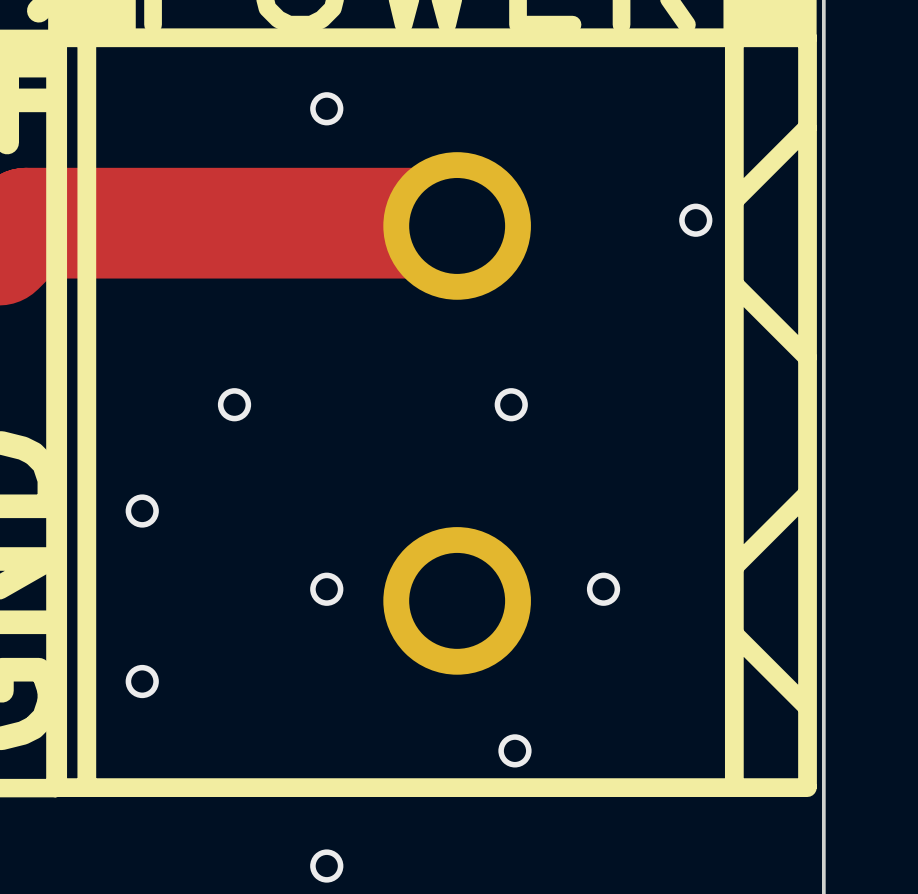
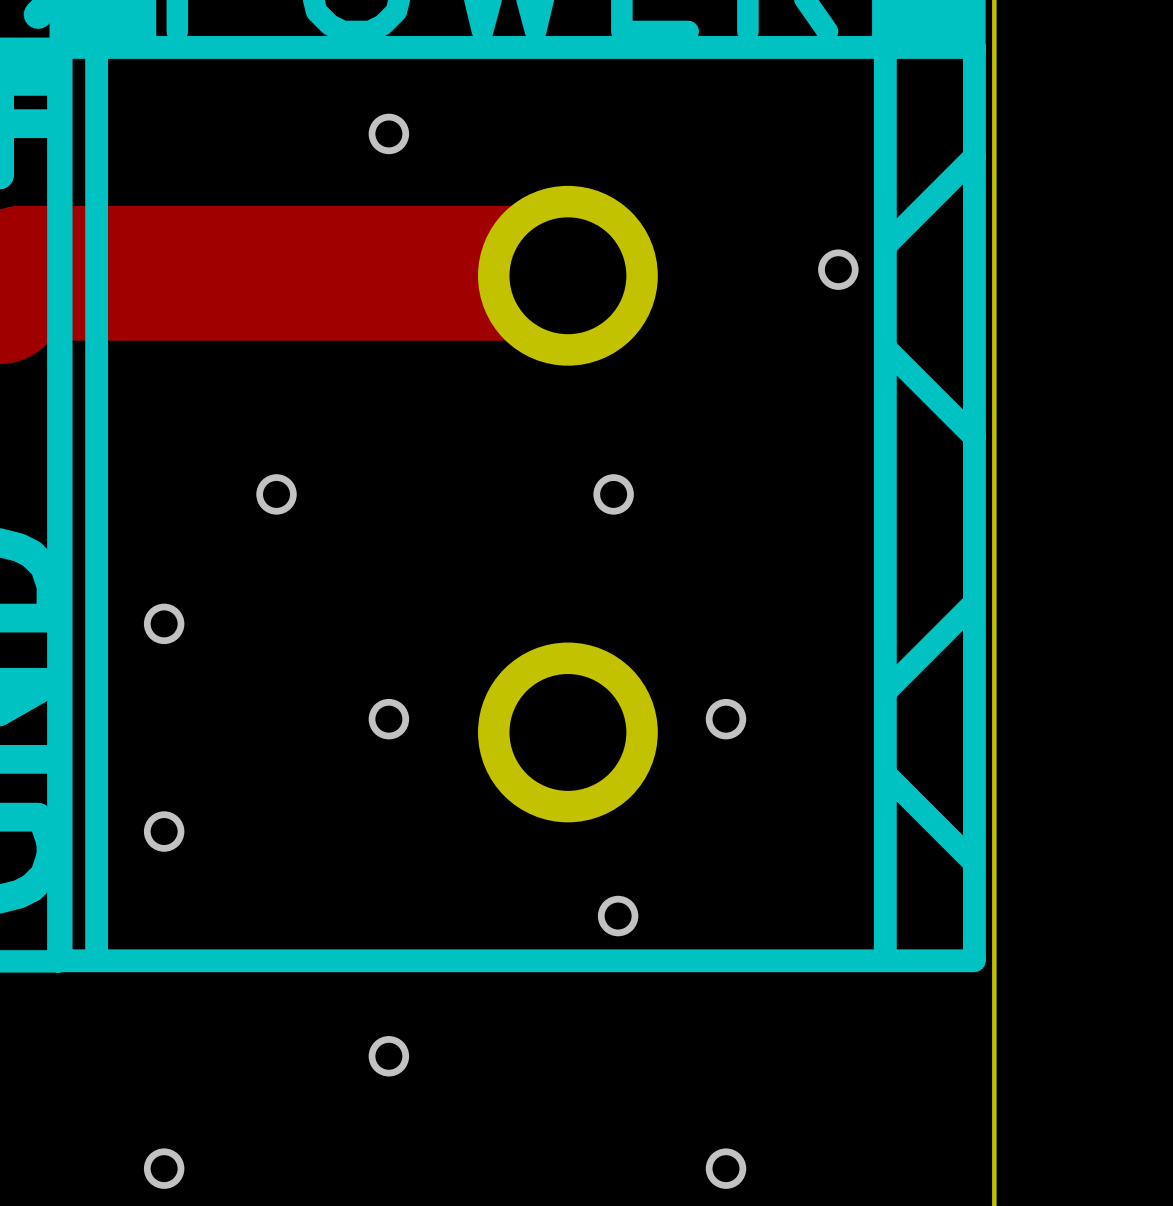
part footprint: [48, 28, 817, 797] -> [49, 36, 986, 973]

